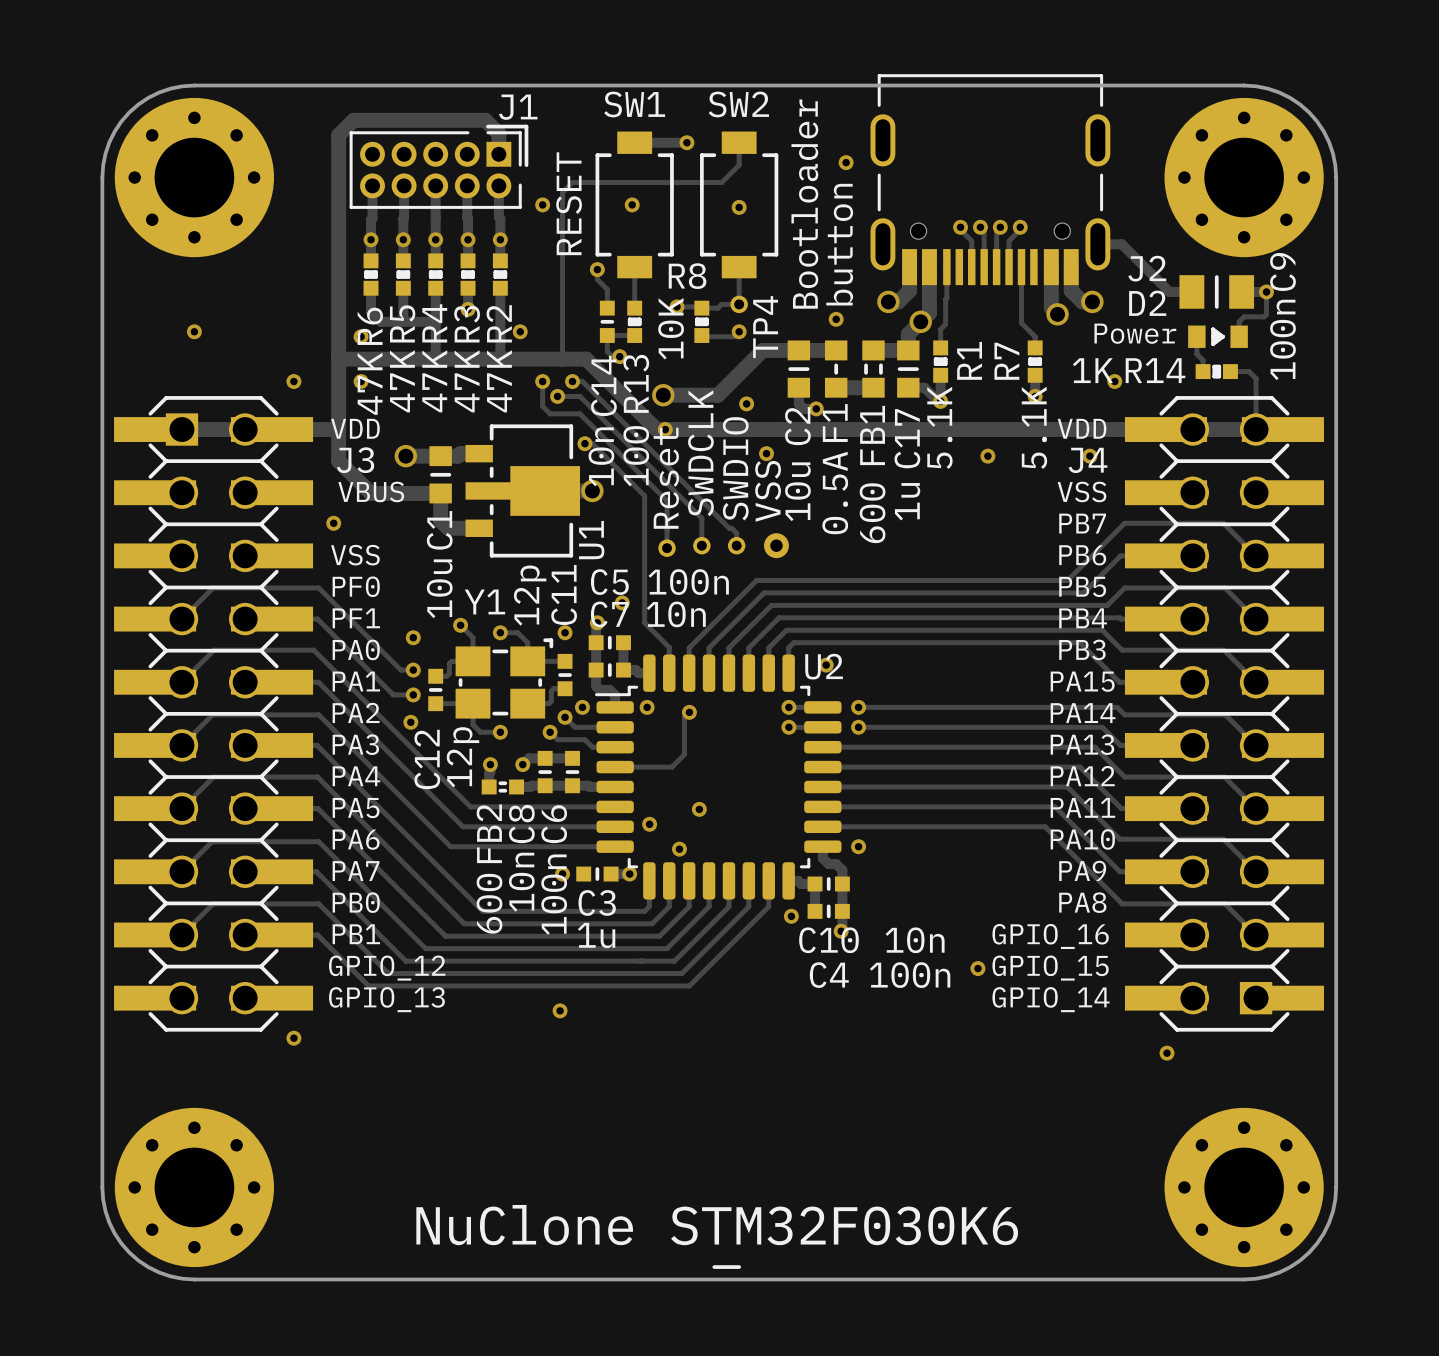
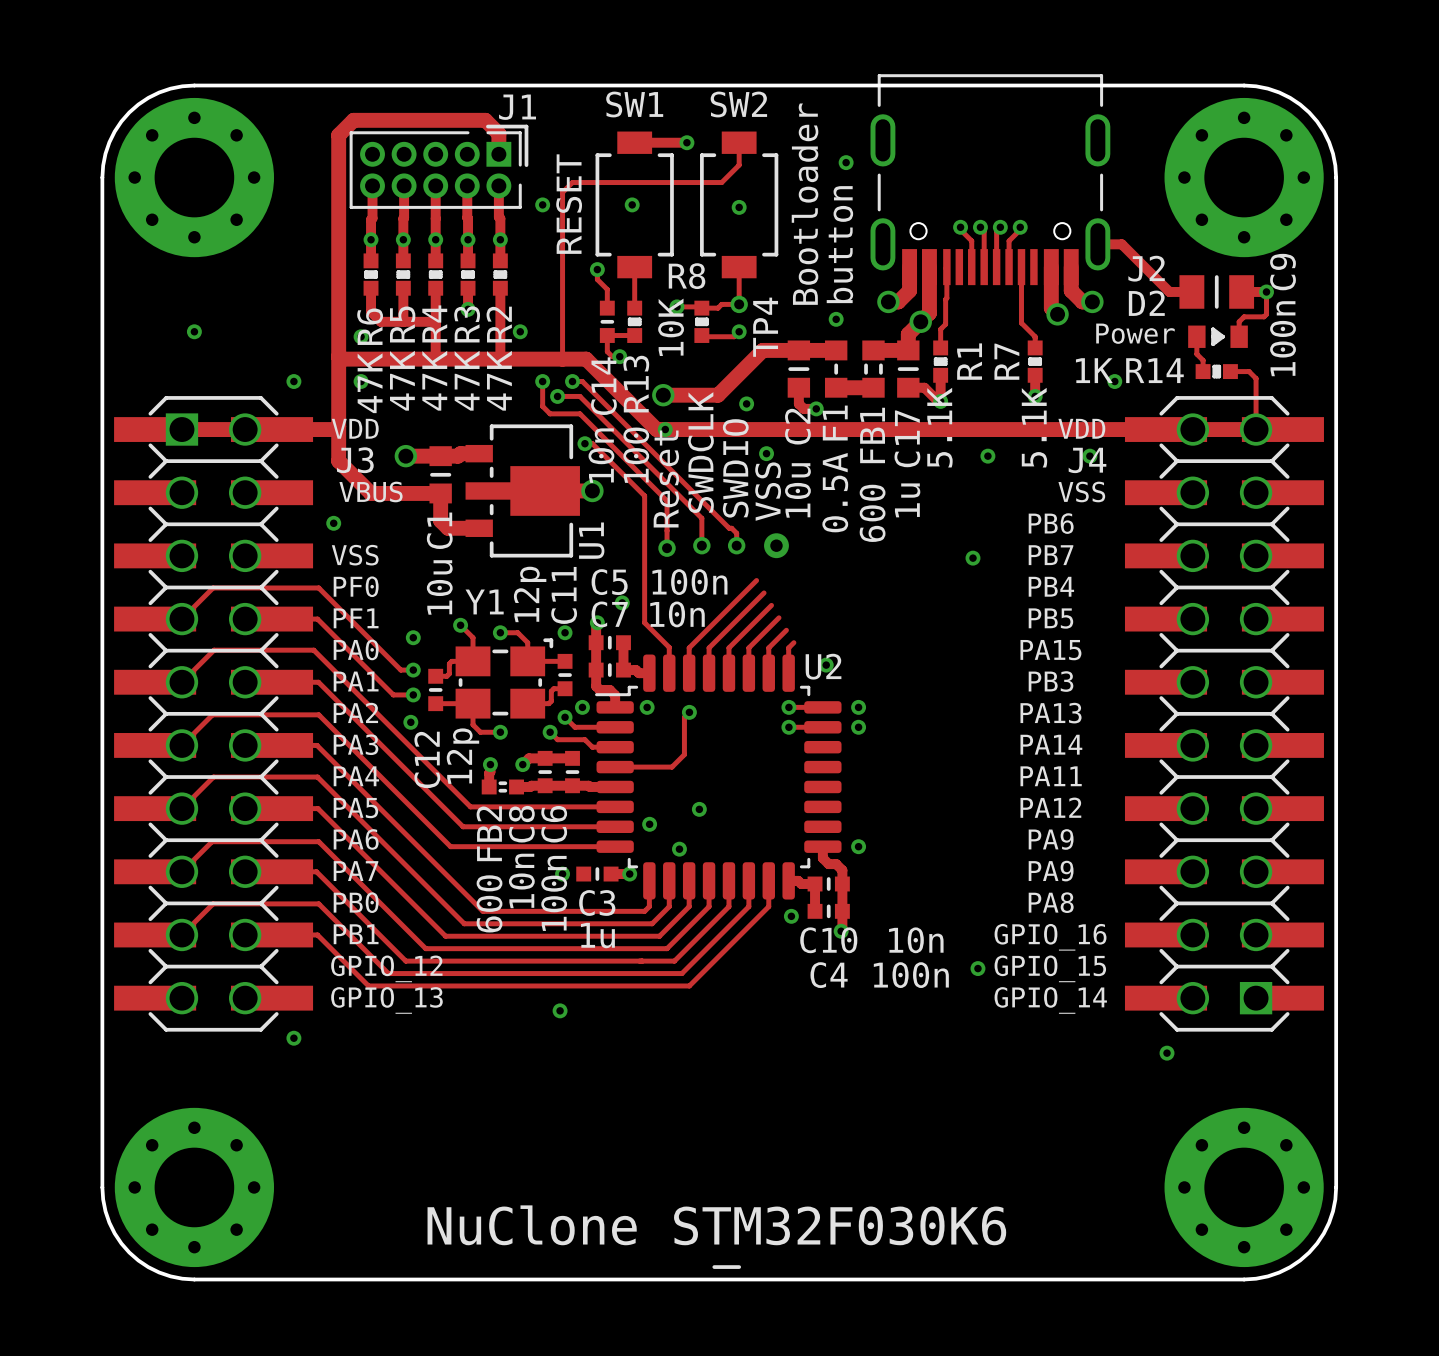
J4 footprint: [1124, 396, 1324, 1032] -> [1124, 396, 1324, 1032]
track: (1166, 555) (1120, 555) (1083, 592) (764, 592) -> none
track: (1256, 555) (1223, 523) (1124, 523) (1067, 580) (756, 580) -> none
via: none -> (972, 558)
track: (771, 605) (1107, 605) (1124, 587) (1224, 587) (1256, 619) -> none
track: (778, 617) (1166, 619) -> none
track: (786, 630) (1102, 630) (1122, 650) (1223, 650) (1256, 682) -> none
track: (793, 642) (1079, 642) (1119, 682) (1166, 682) -> none
track: (858, 707) (1117, 707) (1124, 714) (1225, 714) (1256, 745) -> none
track: (858, 727) (1102, 727) (1120, 745) (1166, 745) -> none
track: (822, 747) (1094, 747) (1124, 777) (1224, 777) (1256, 808) -> none
track: (822, 767) (1079, 767) (1121, 808) (1166, 808) -> none
track: (822, 786) (1067, 786) (1119, 839) (1223, 839) (1256, 871) -> none
track: (822, 806) (1055, 806) (1120, 871) (1166, 871) -> none
track: (822, 826) (1045, 826) (1122, 903) (1224, 903) (1256, 934) -> none

